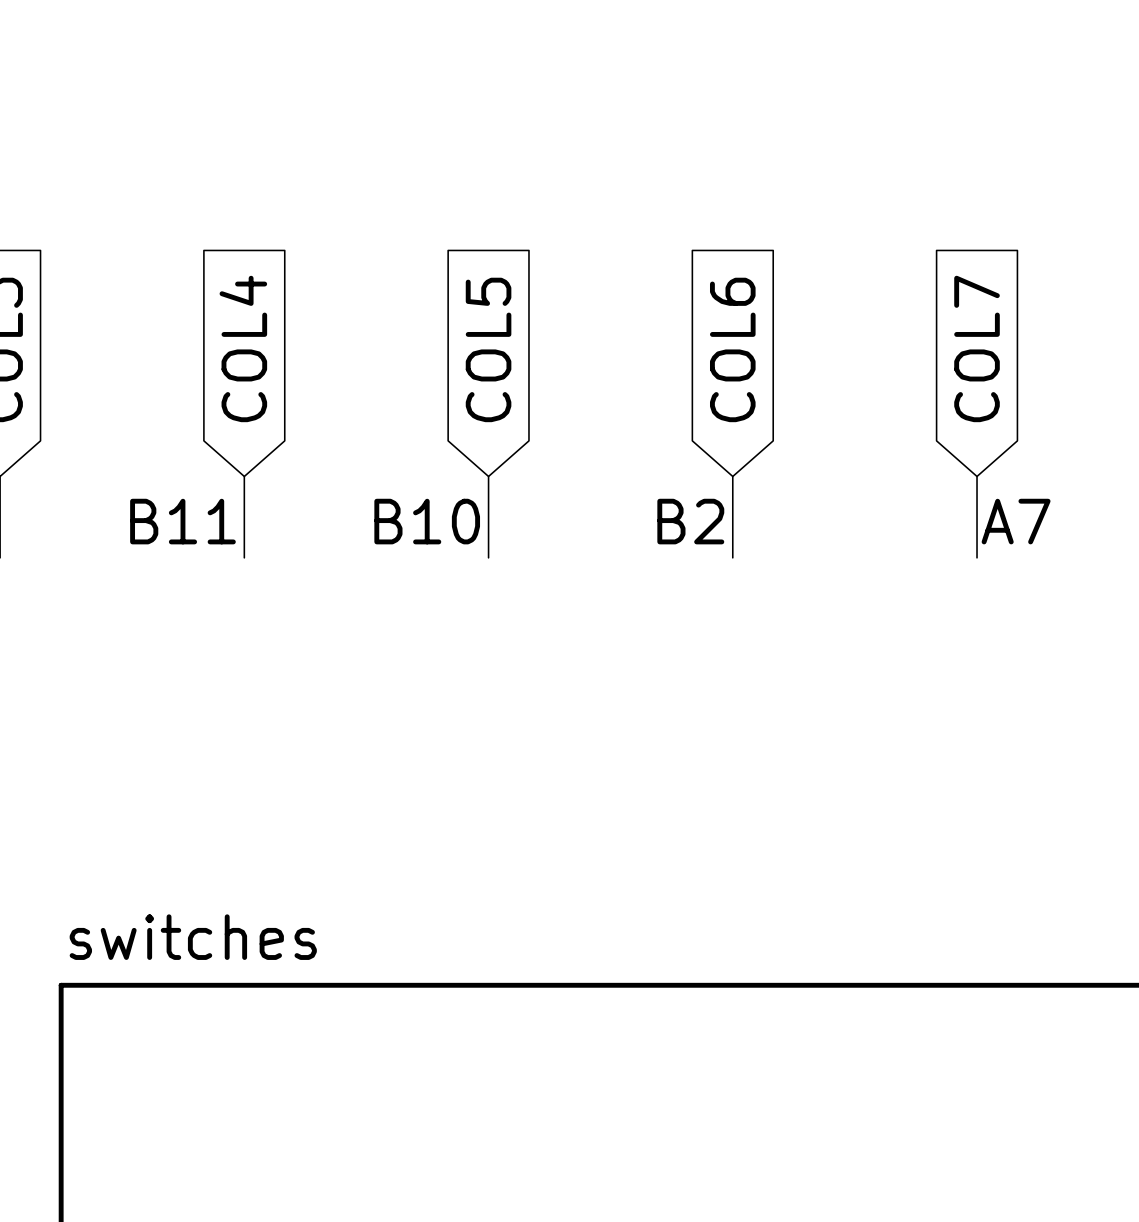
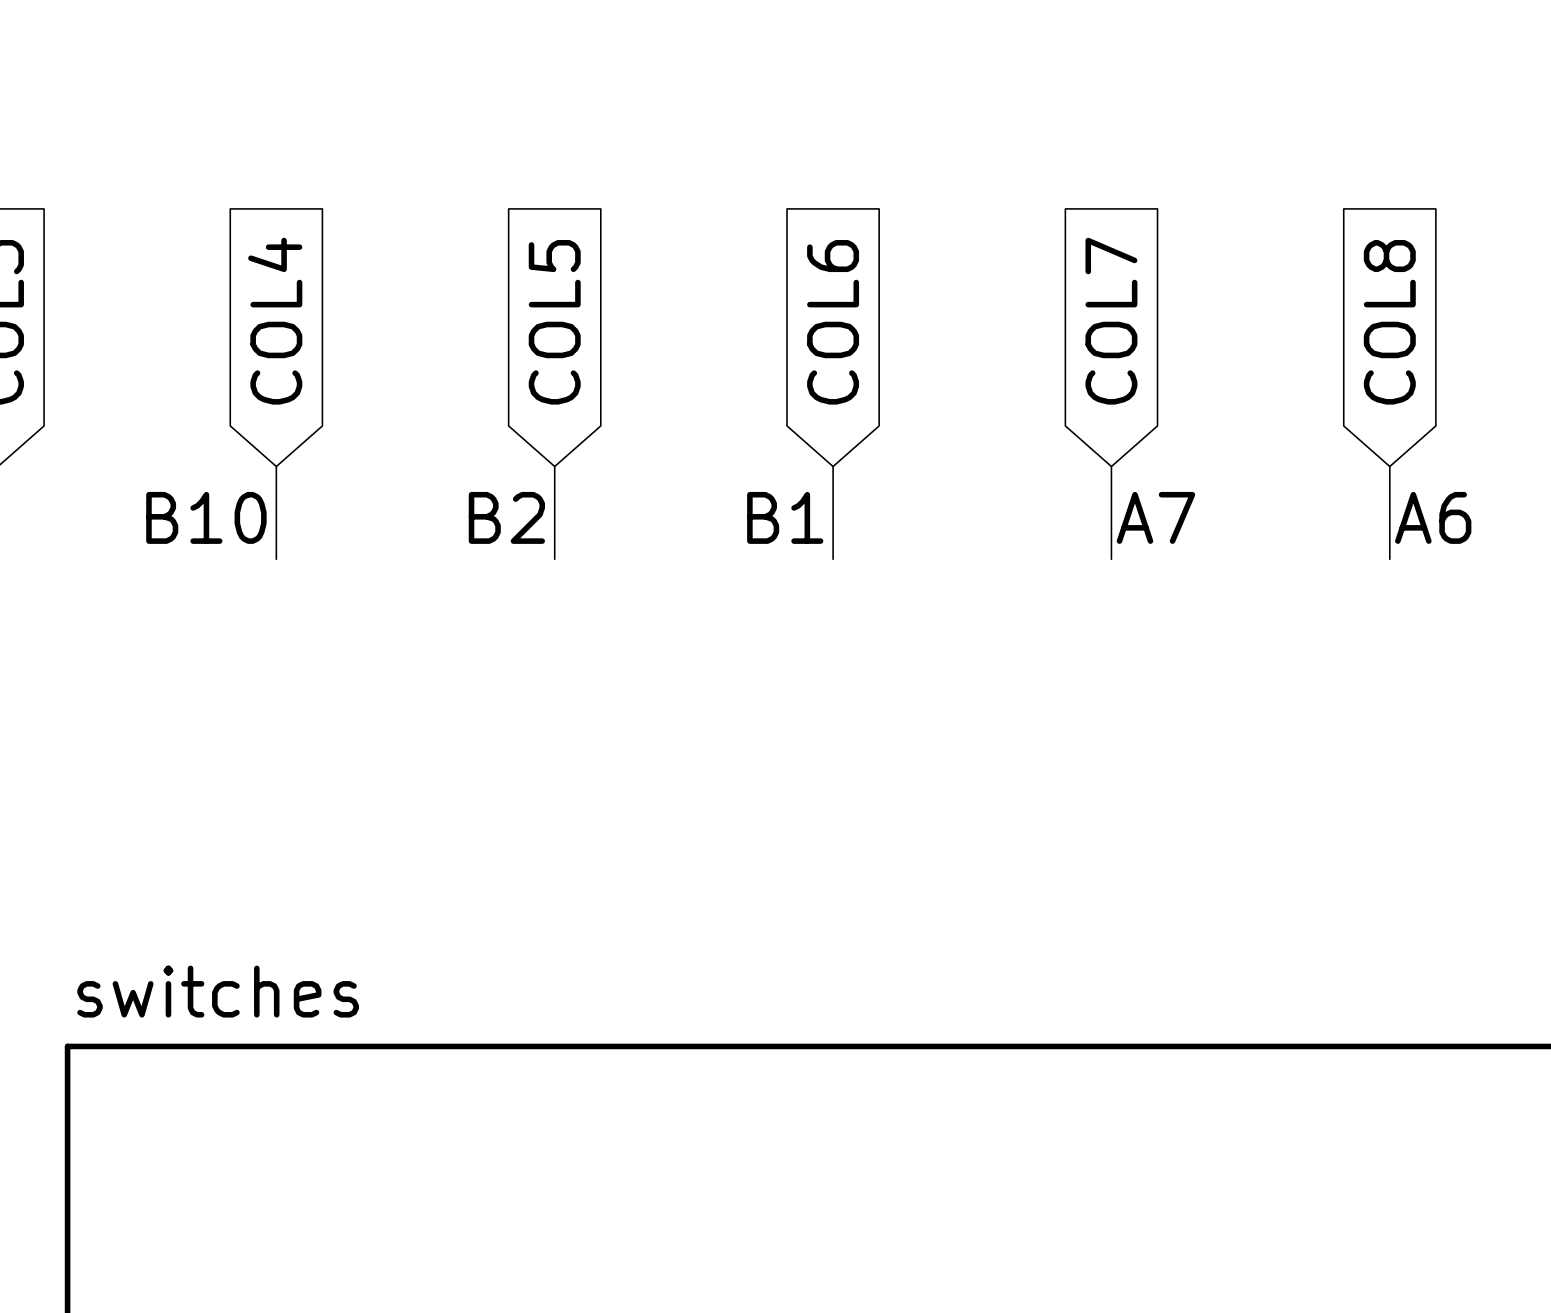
label: B11 (182, 521) -> B10 (206, 517)
label: B10 (427, 521) -> B2 (506, 517)
label: B2 (690, 521) -> B1 (785, 517)

